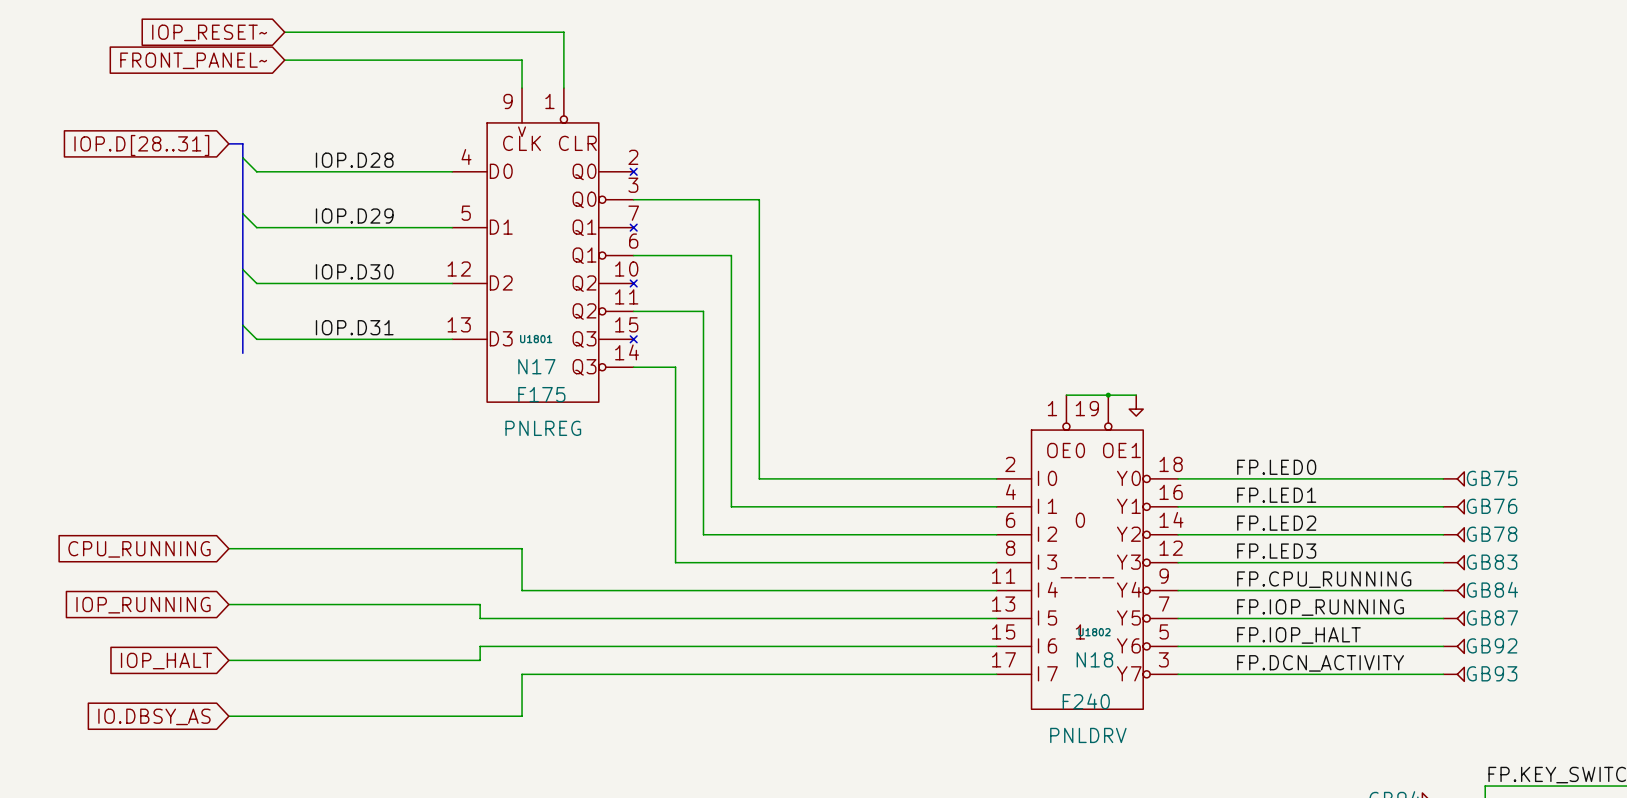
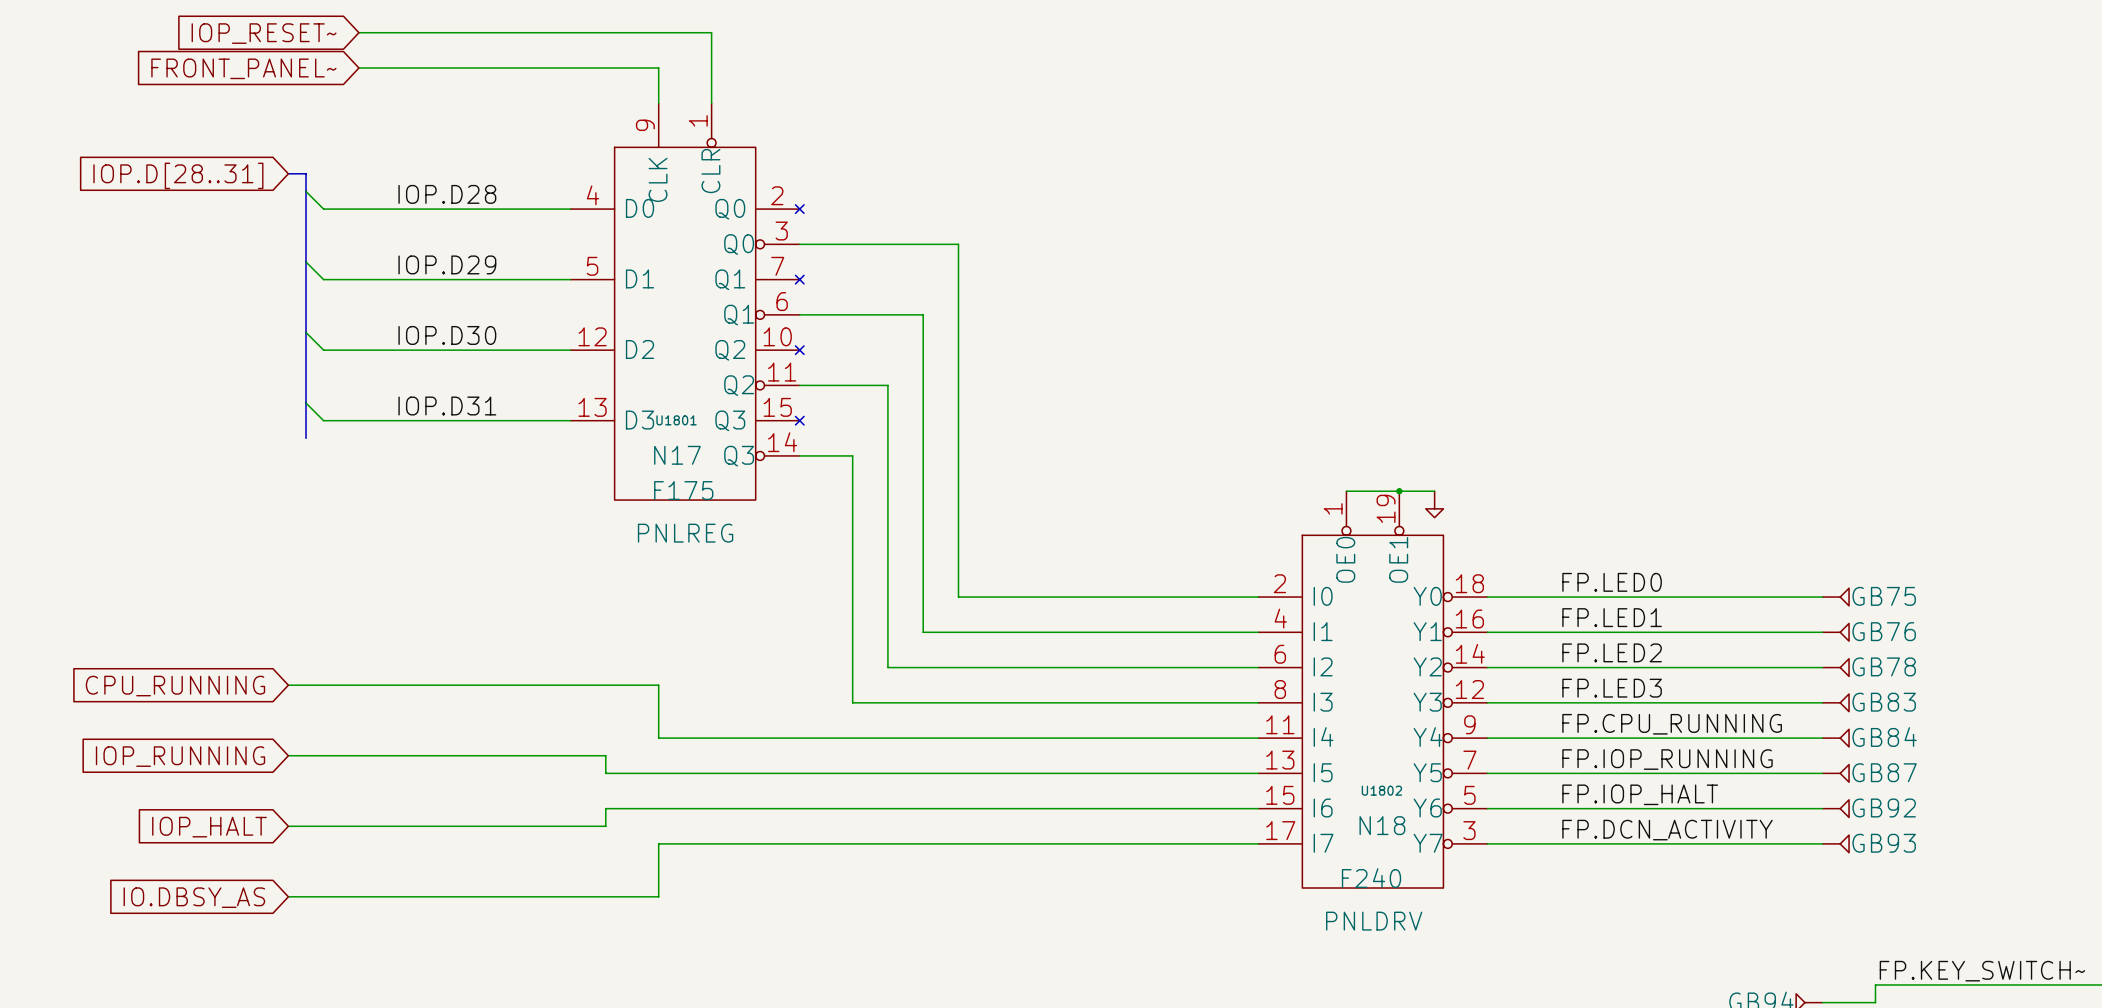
U1801 symbol: [452, 88, 634, 403] -> [570, 103, 800, 501]
U1802 symbol: [996, 395, 1179, 710] -> [1258, 491, 1488, 889]

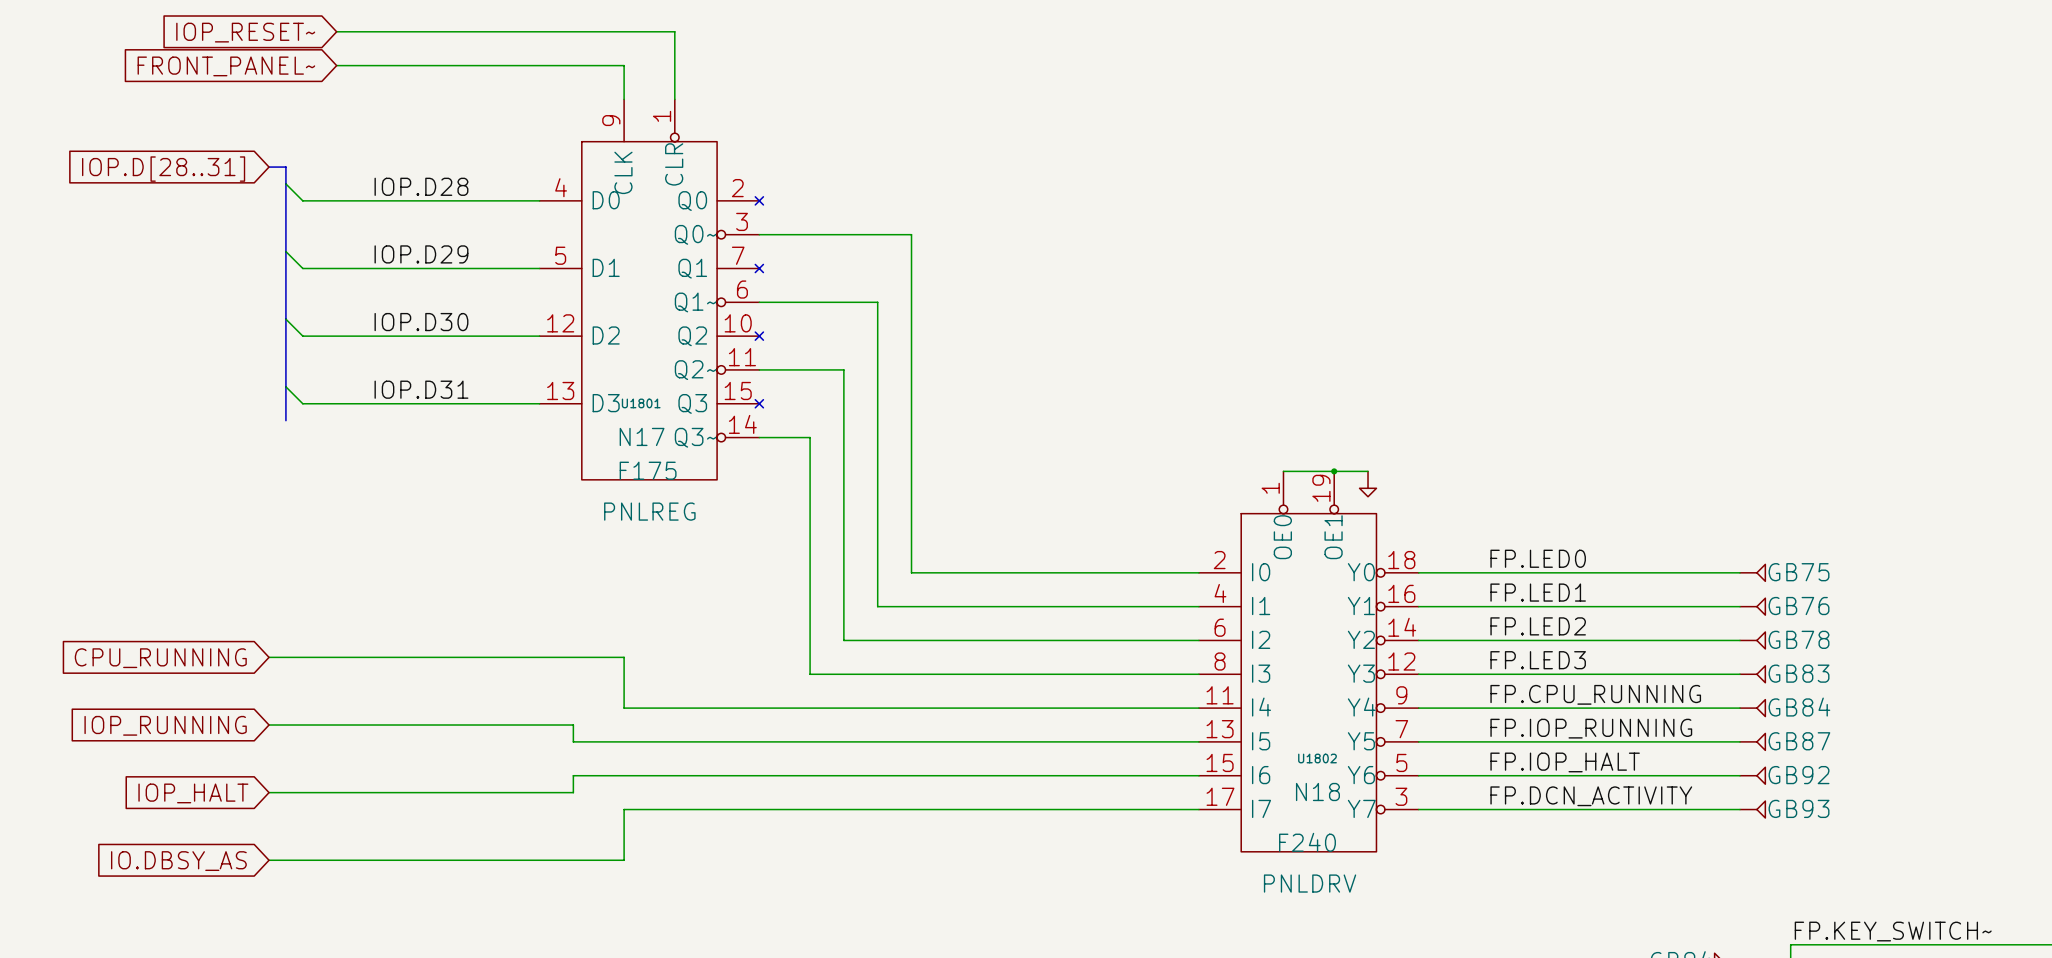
U1801 pin name: Q0 (739, 244) -> Q0~ (695, 234)
U1801 pin name: Q1 (739, 315) -> Q1~ (695, 302)
U1801 pin name: Q2 (739, 385) -> Q2~ (695, 370)
U1801 pin name: Q3 (739, 456) -> Q3~ (695, 437)

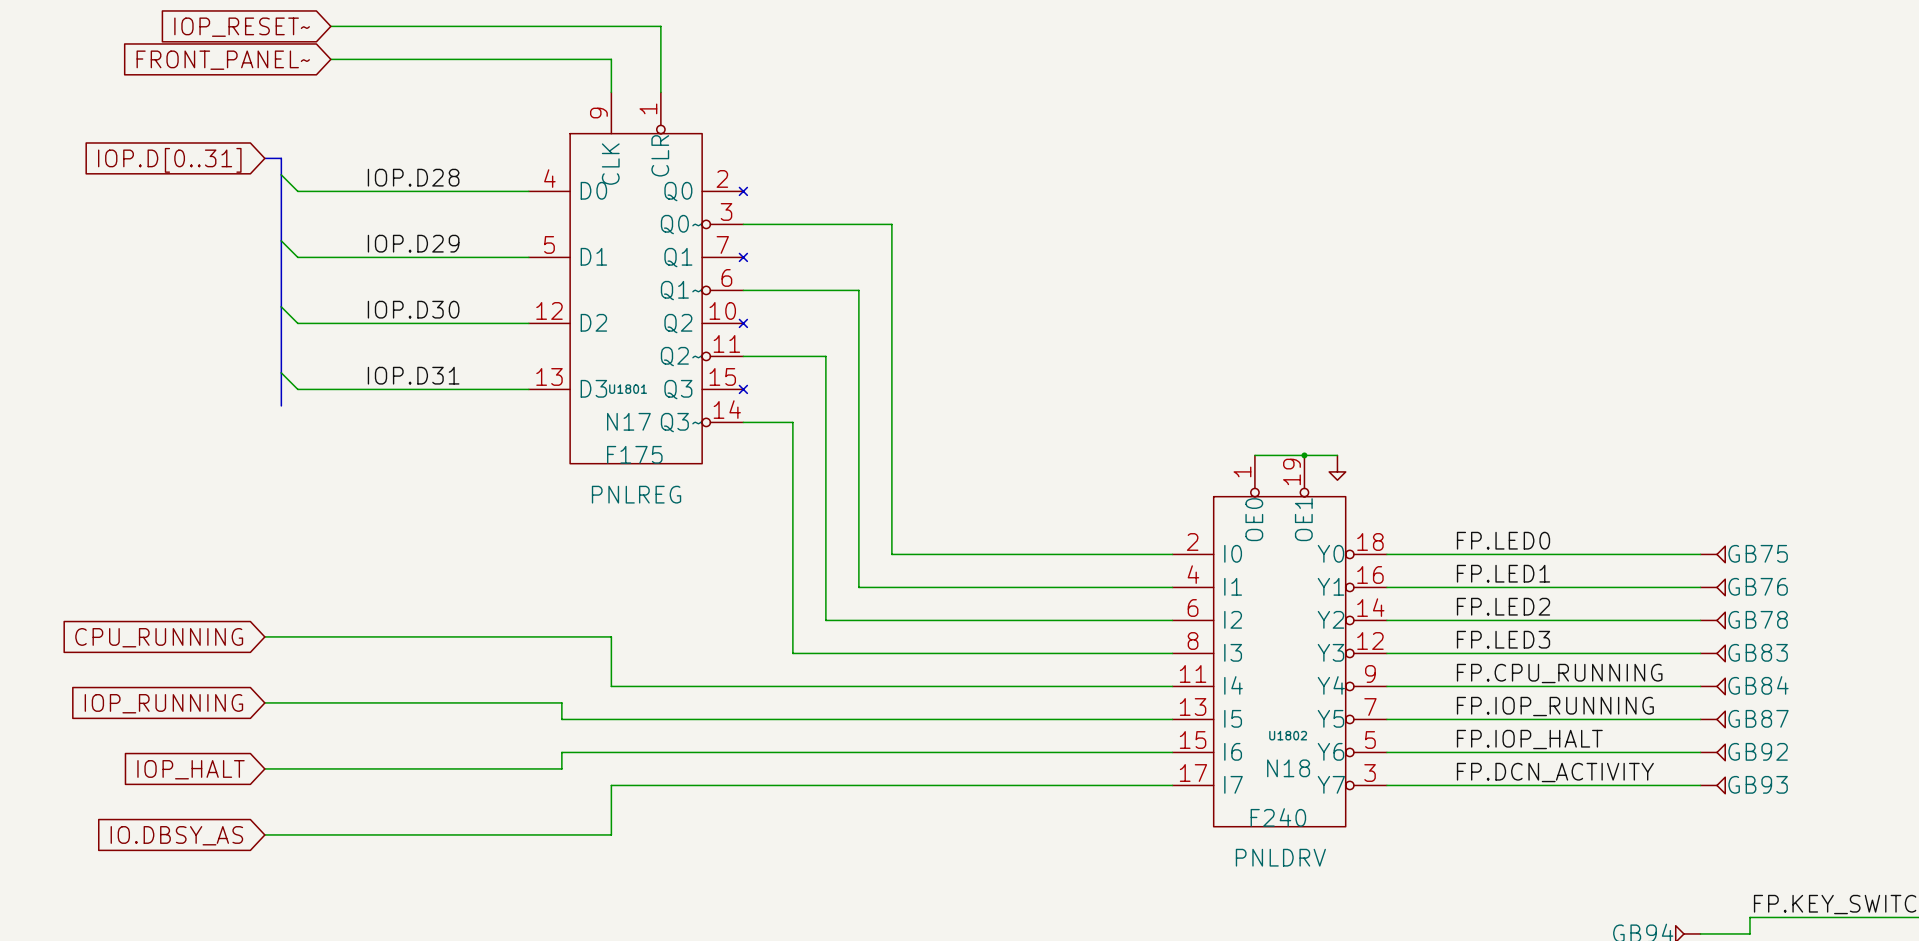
global label: IOP.D[28..31] (163, 169) -> IOP.D[0..31] (169, 160)

